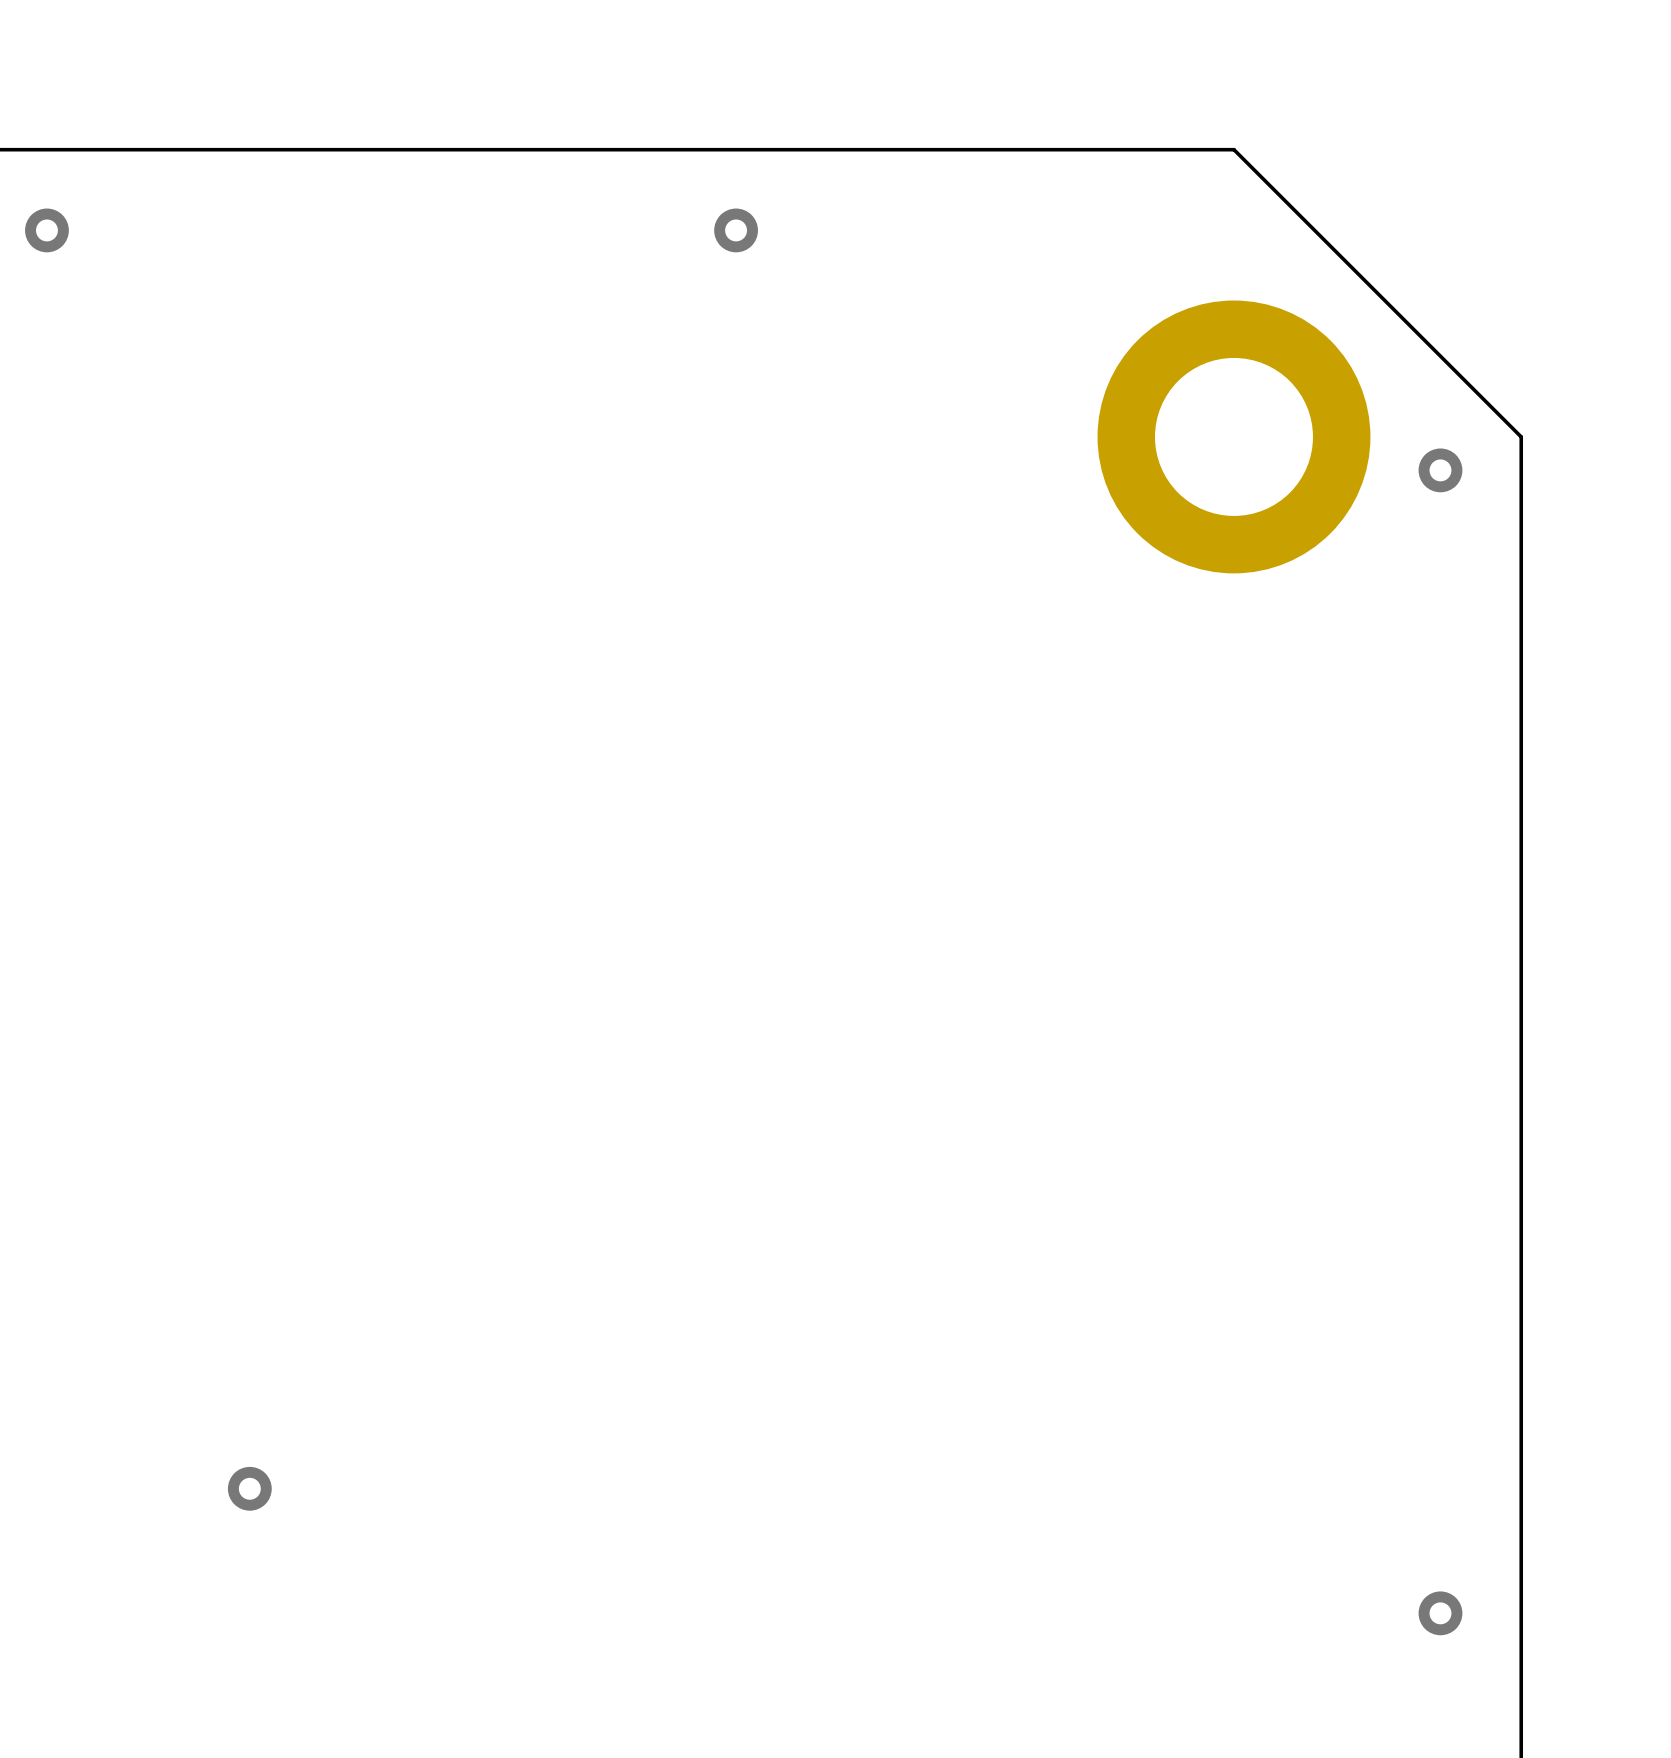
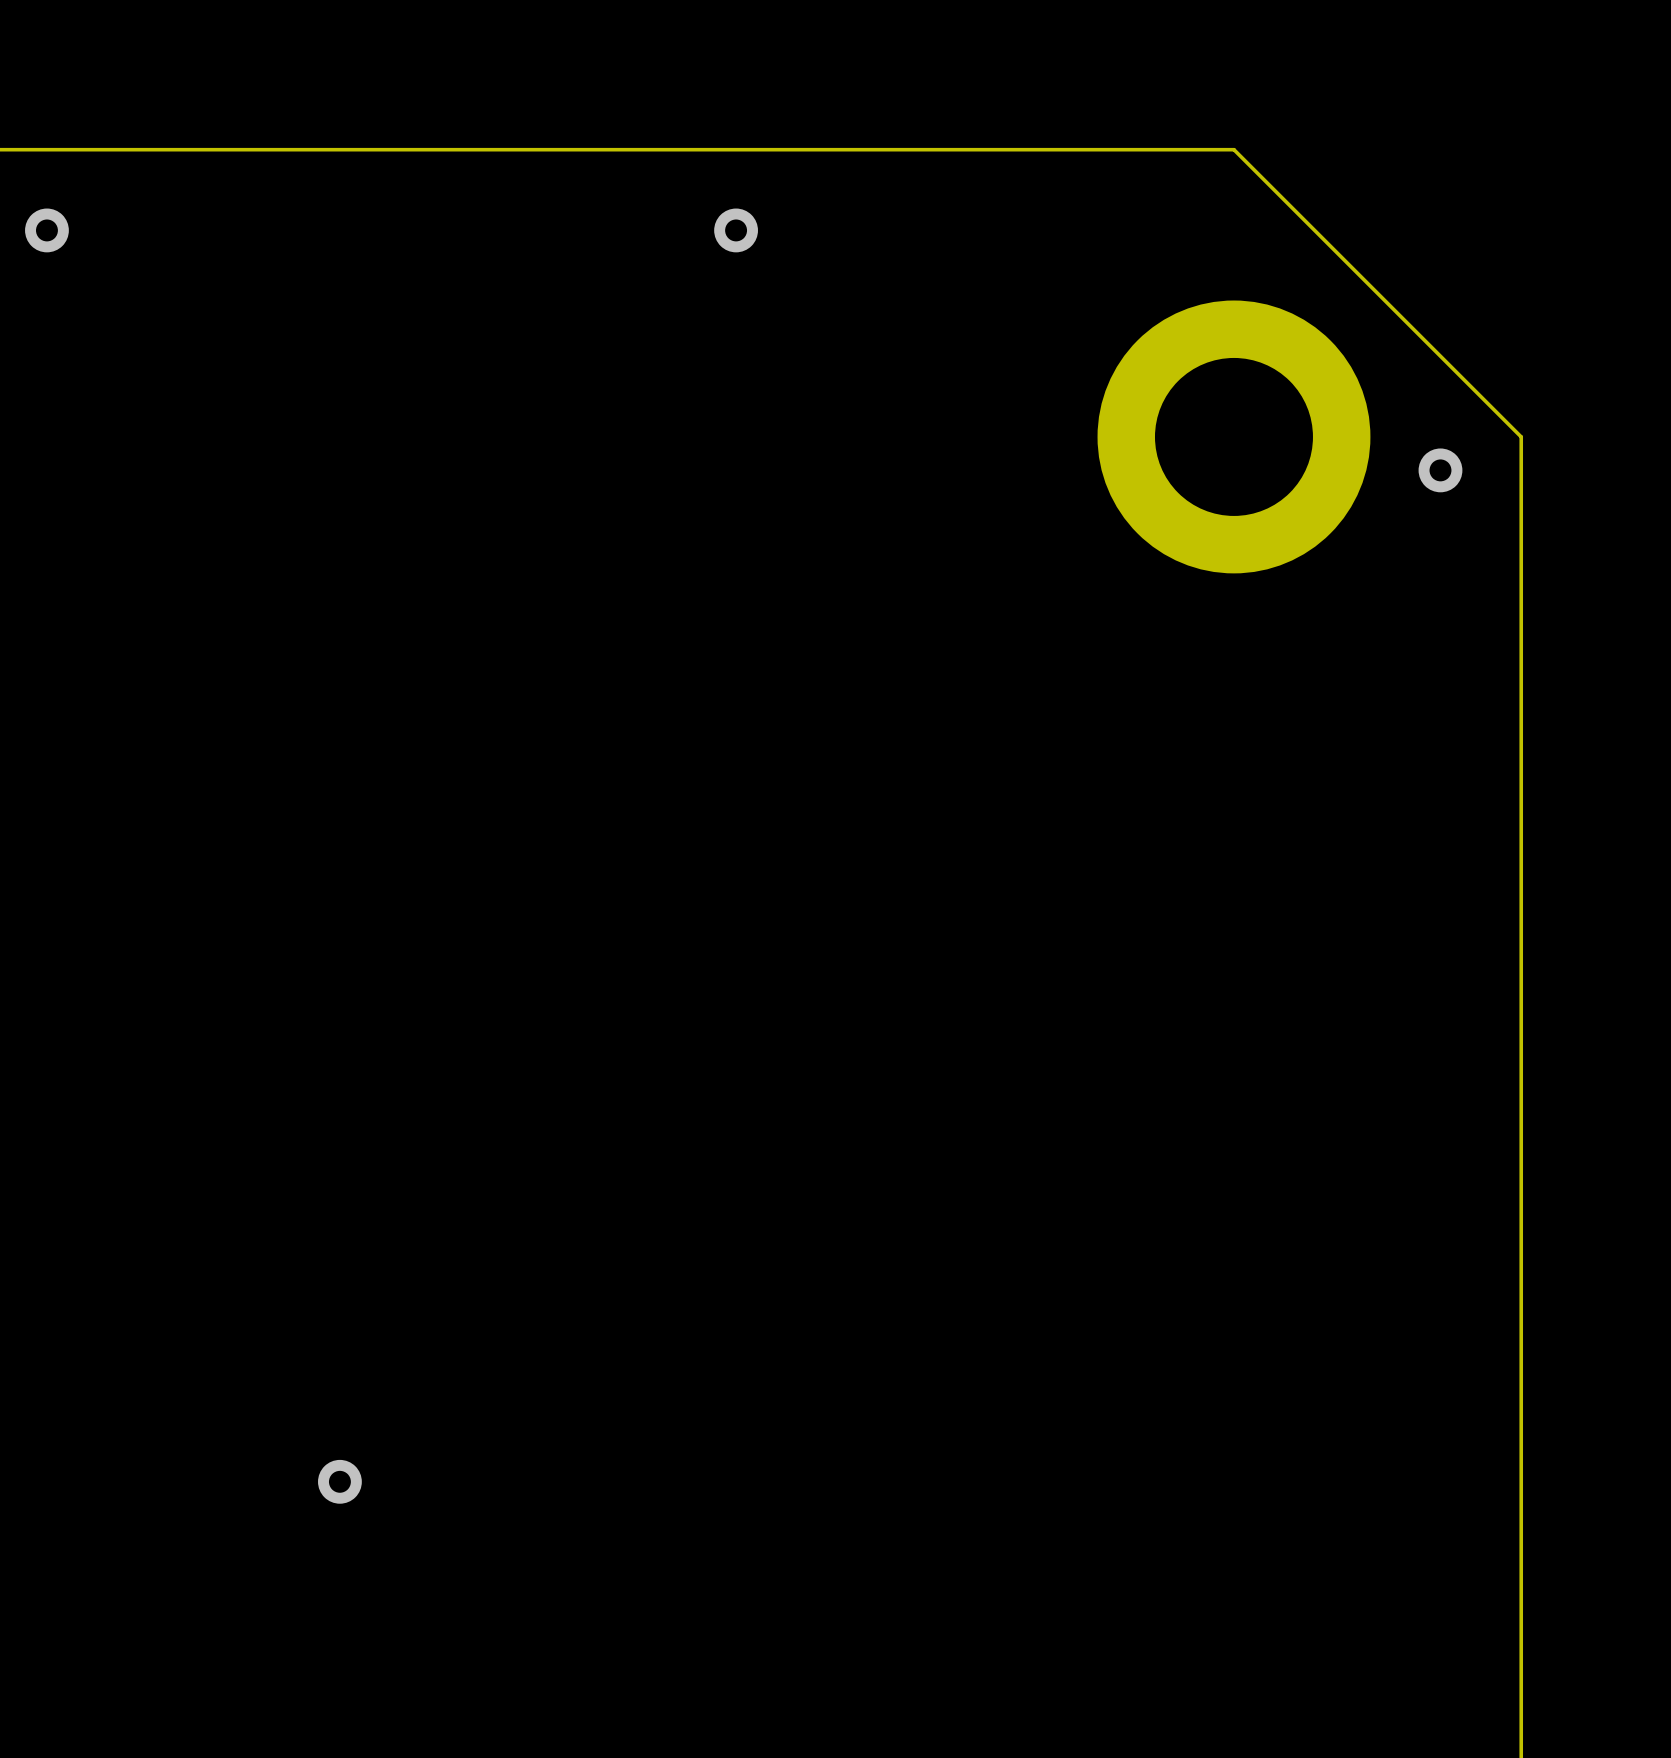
via position: (249, 1488) -> (339, 1481)
via: (1440, 1613) -> none

